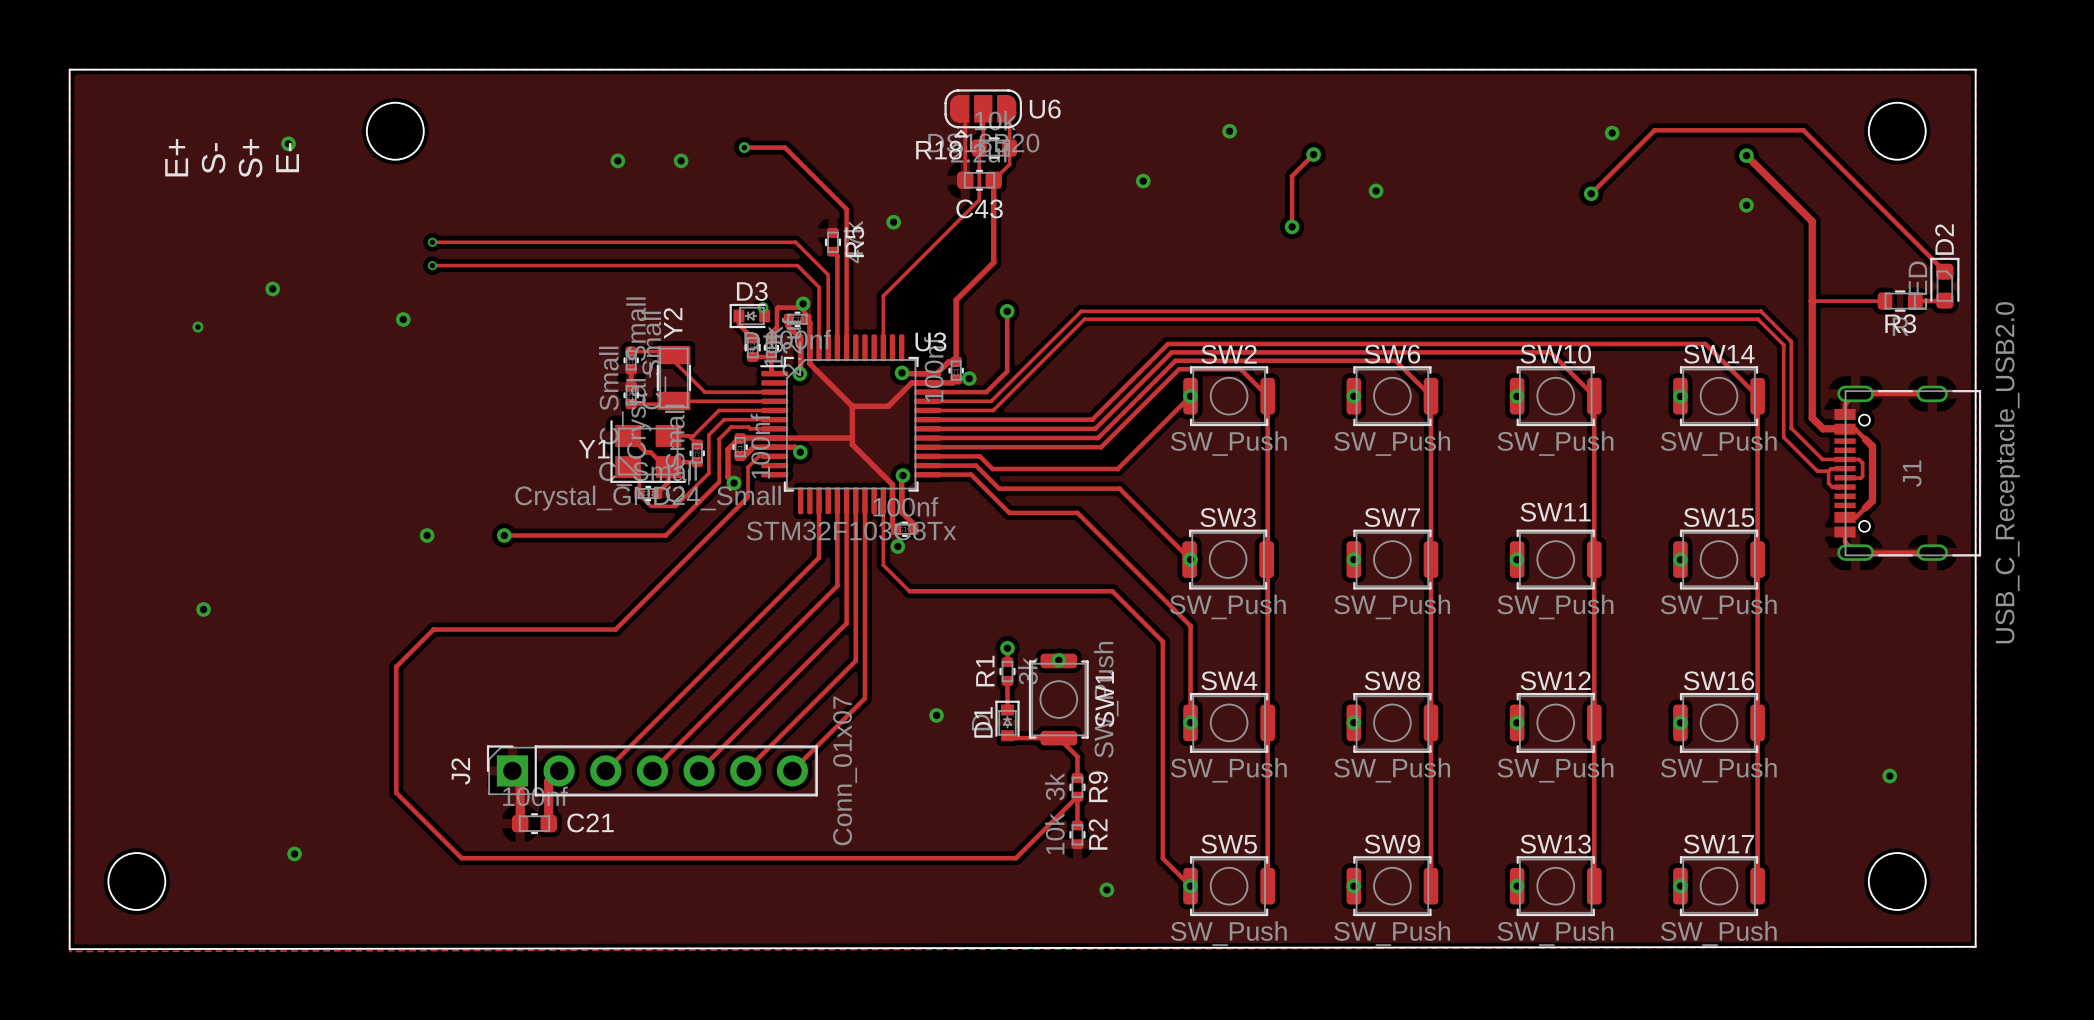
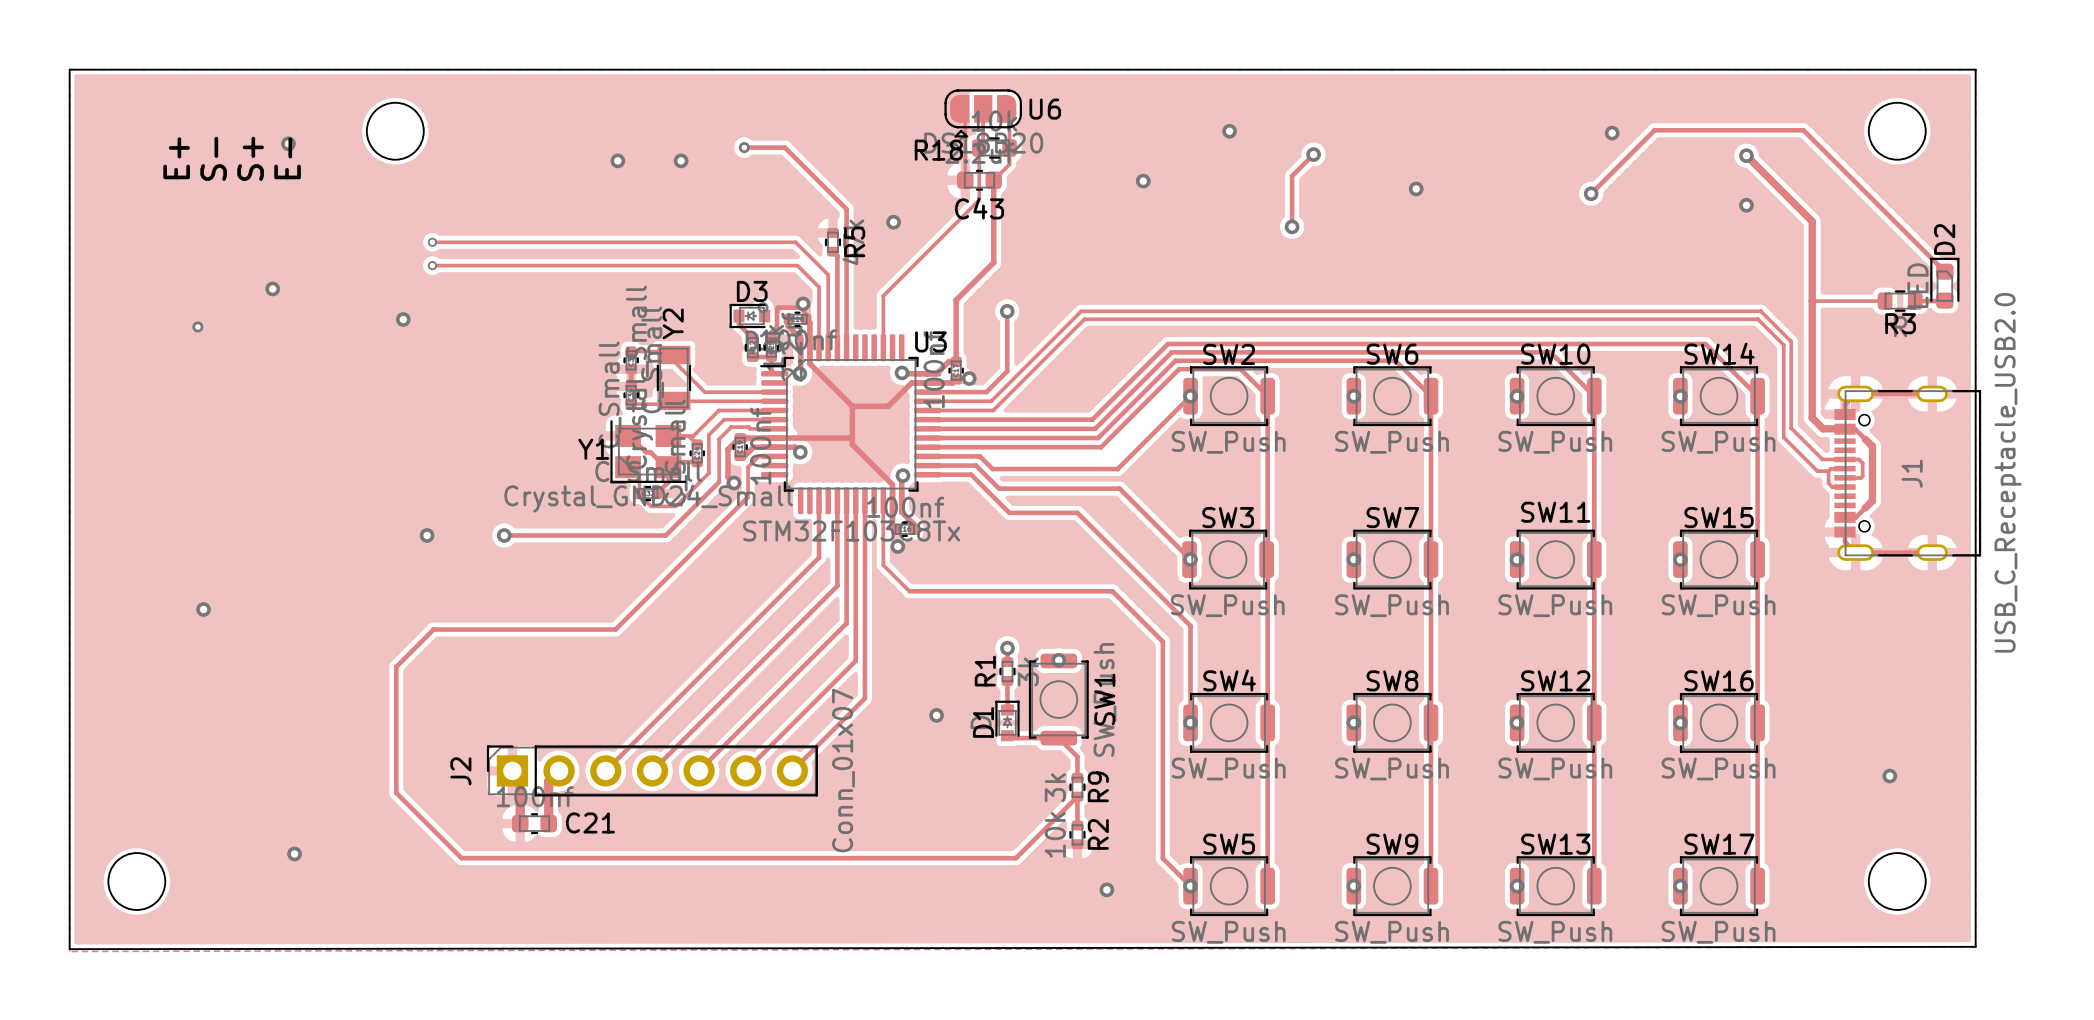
via position: (1376, 190) -> (1416, 188)

